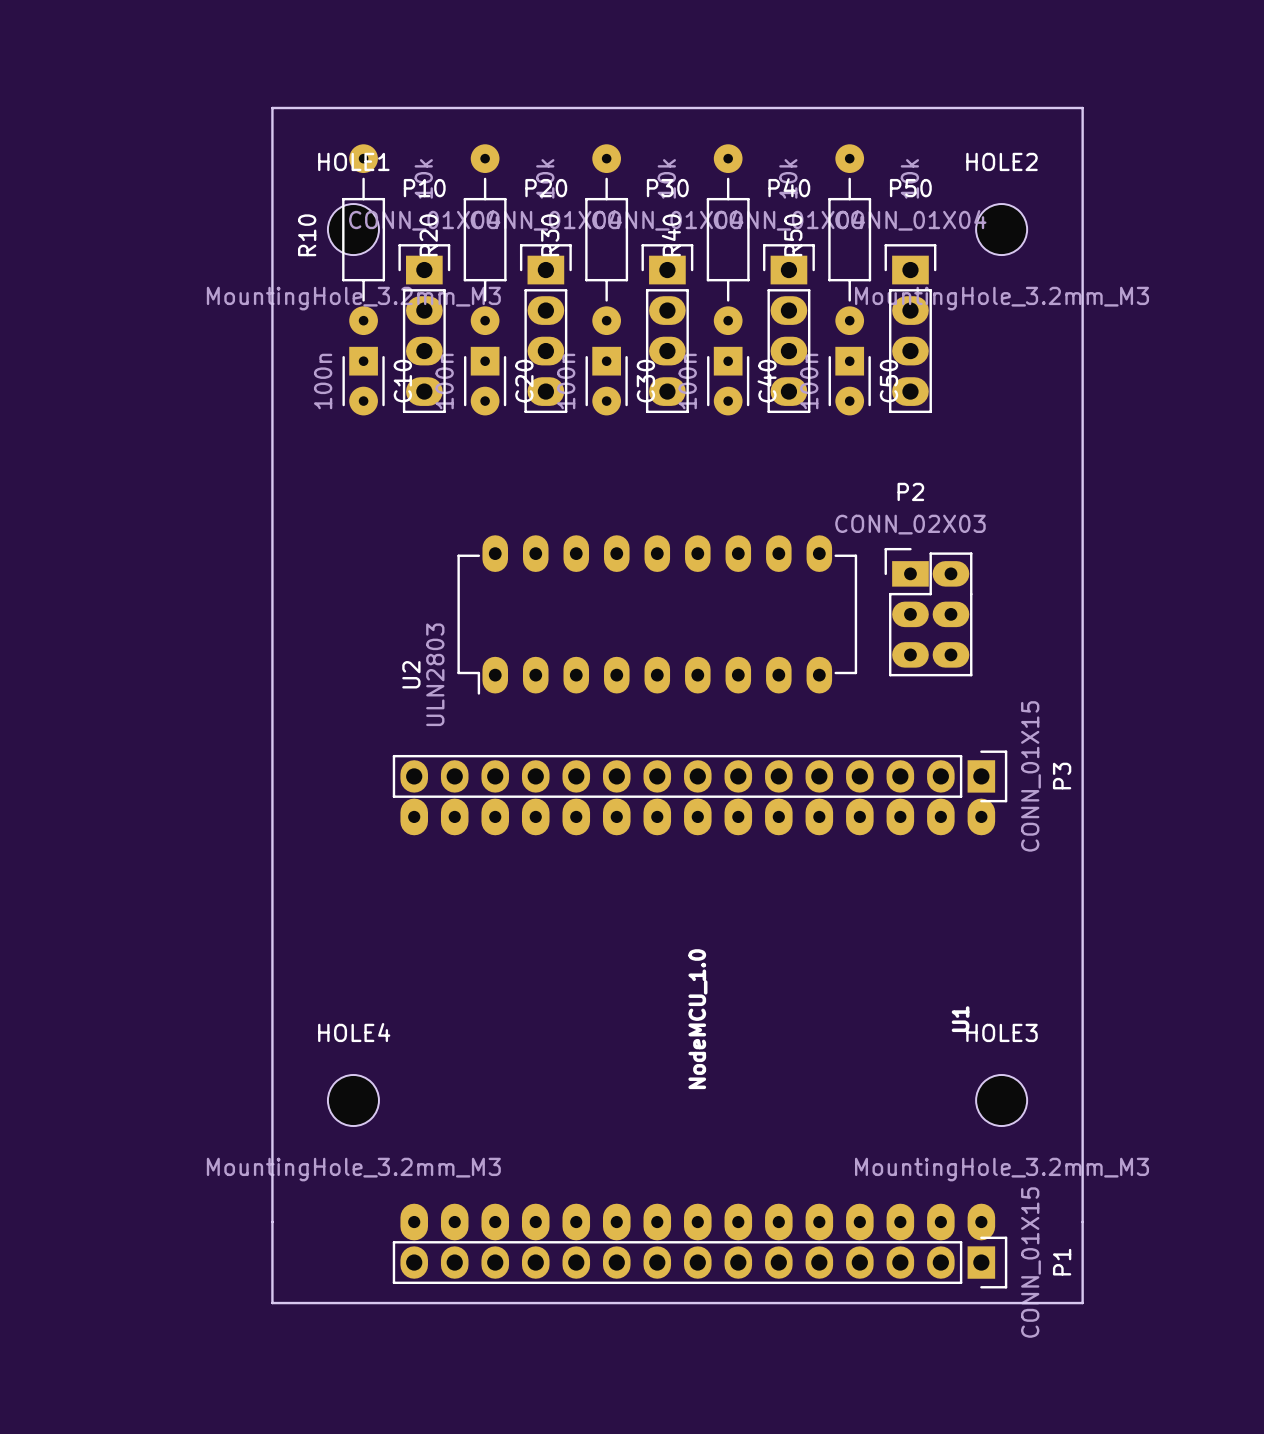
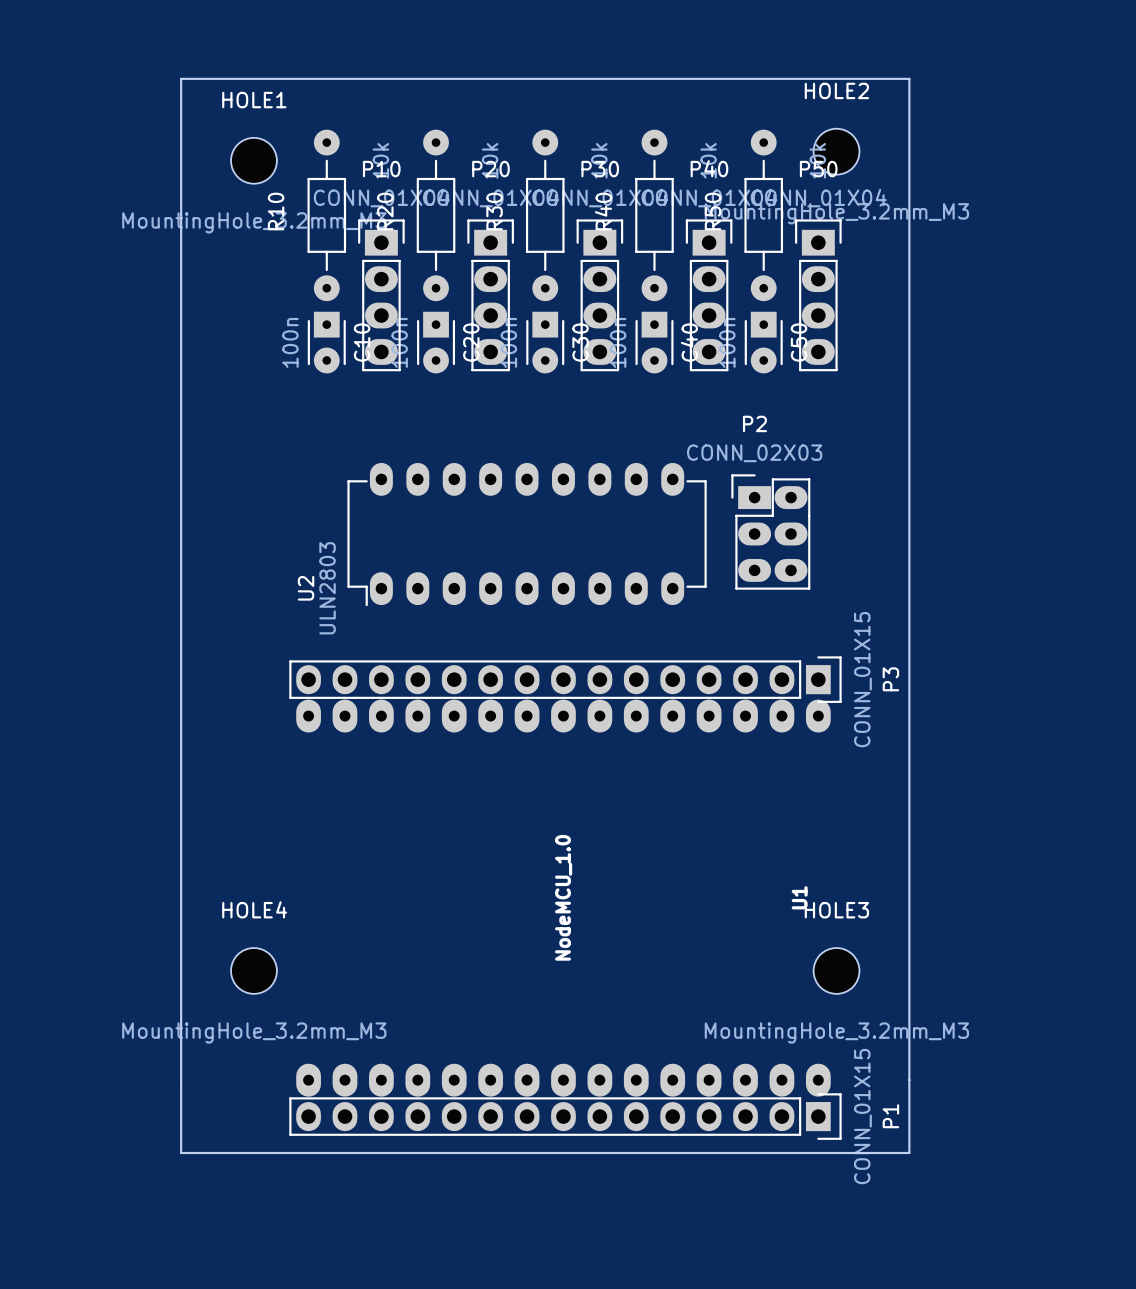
board edge: (272, 108) (272, 1303) (1082, 1303) (1082, 108) (272, 108) -> (181, 78) (181, 1152) (909, 1152) (909, 78) (181, 78)
HOLE1 position: (353, 229) -> (253, 160)
HOLE2 position: (1001, 229) -> (836, 151)
P2 position: (928, 612) -> (770, 532)
U2 position: (657, 614) -> (527, 534)
P3 position: (700, 776) -> (565, 679)
U1 position: (697, 1019) -> (563, 898)
HOLE4 position: (353, 1100) -> (253, 970)
HOLE3 position: (1001, 1100) -> (836, 970)
P1 position: (700, 1262) -> (565, 1116)

